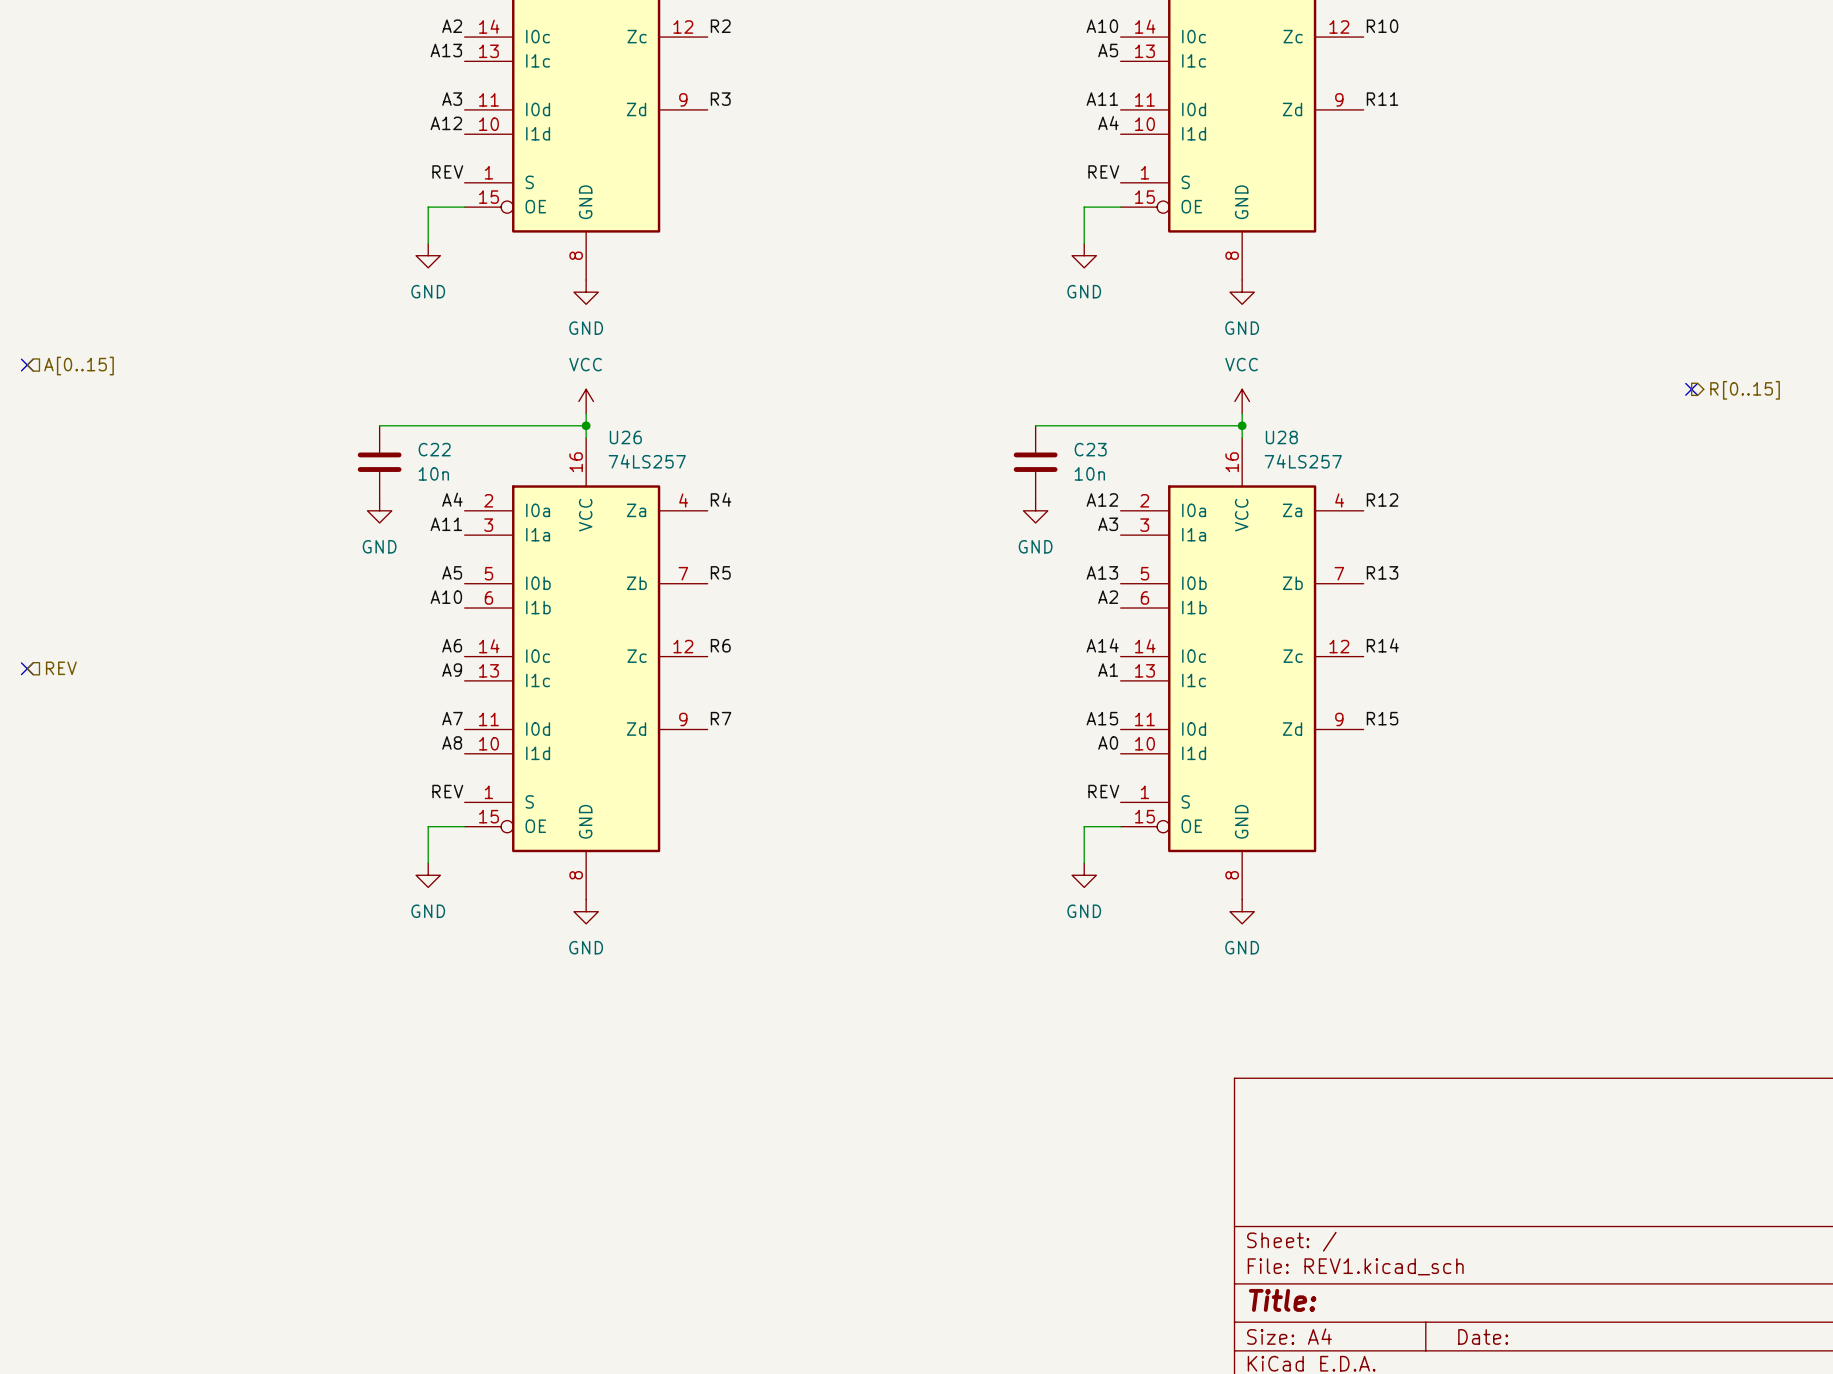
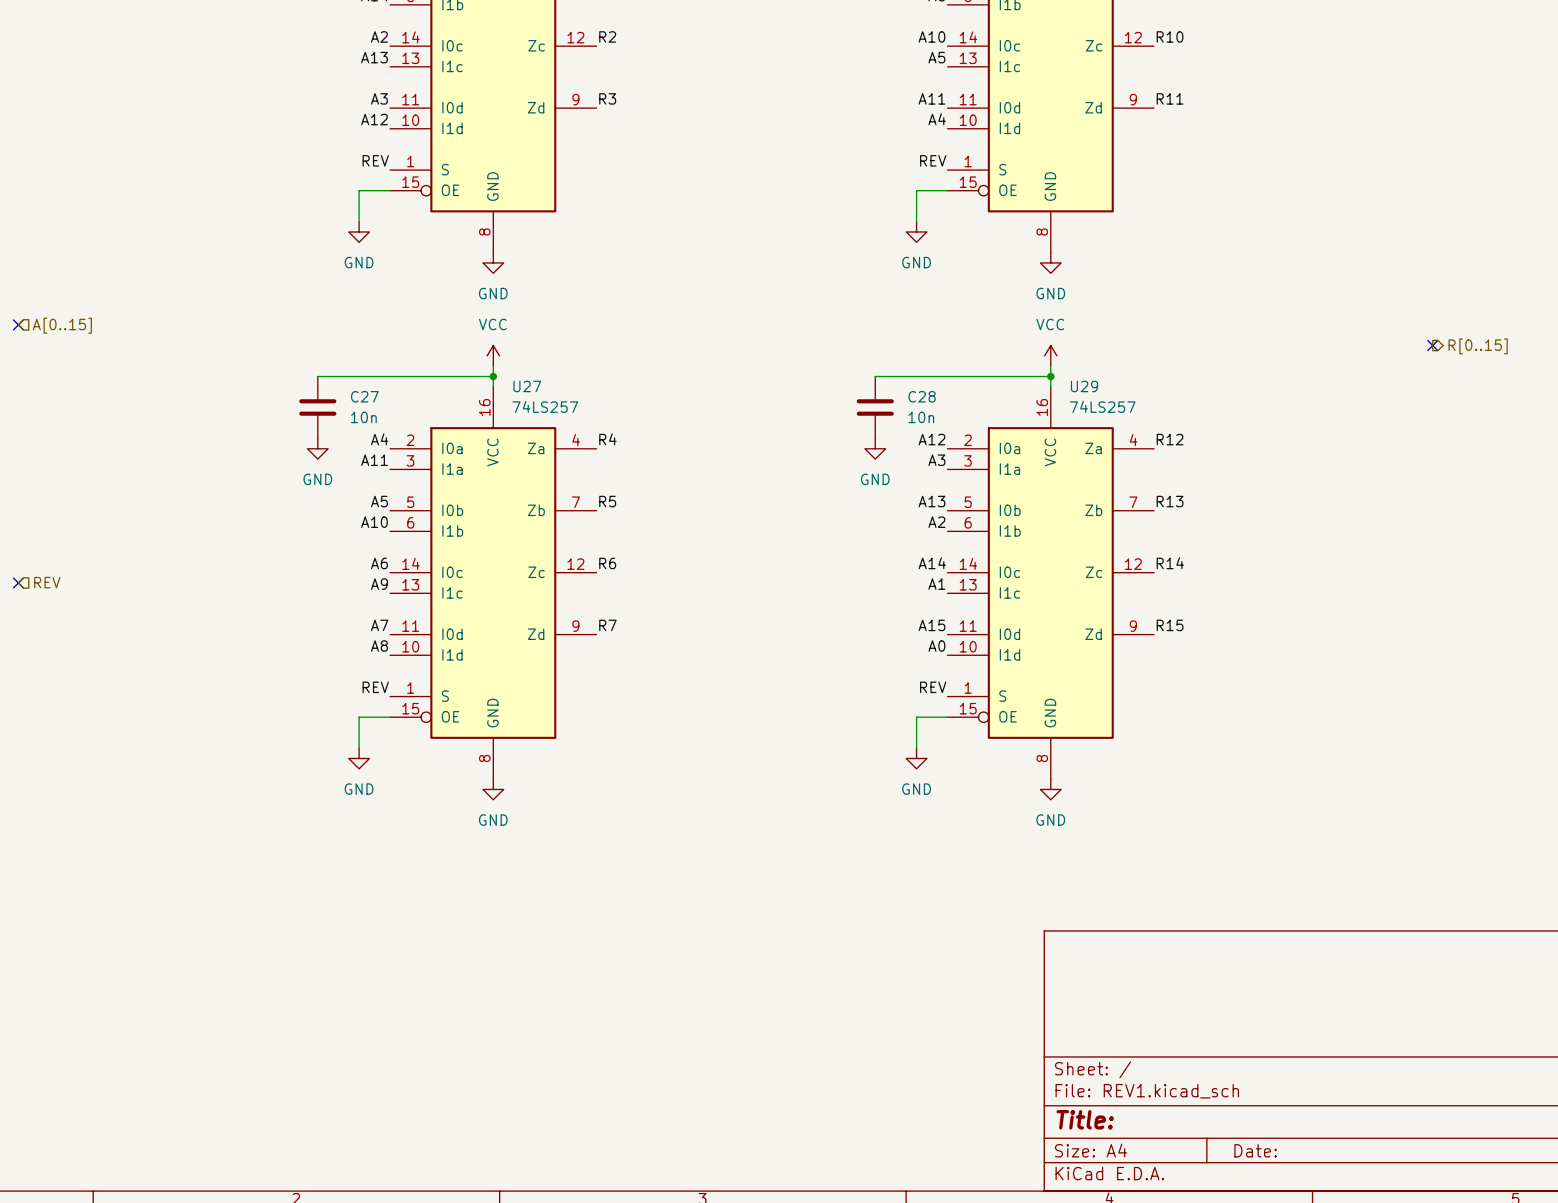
U26 name: U26 (625, 437) -> U27 (527, 386)
U28 name: U28 (1281, 437) -> U29 (1084, 386)
C22 name: C22 (434, 449) -> C27 (364, 396)
C23 name: C23 (1090, 449) -> C28 (922, 396)

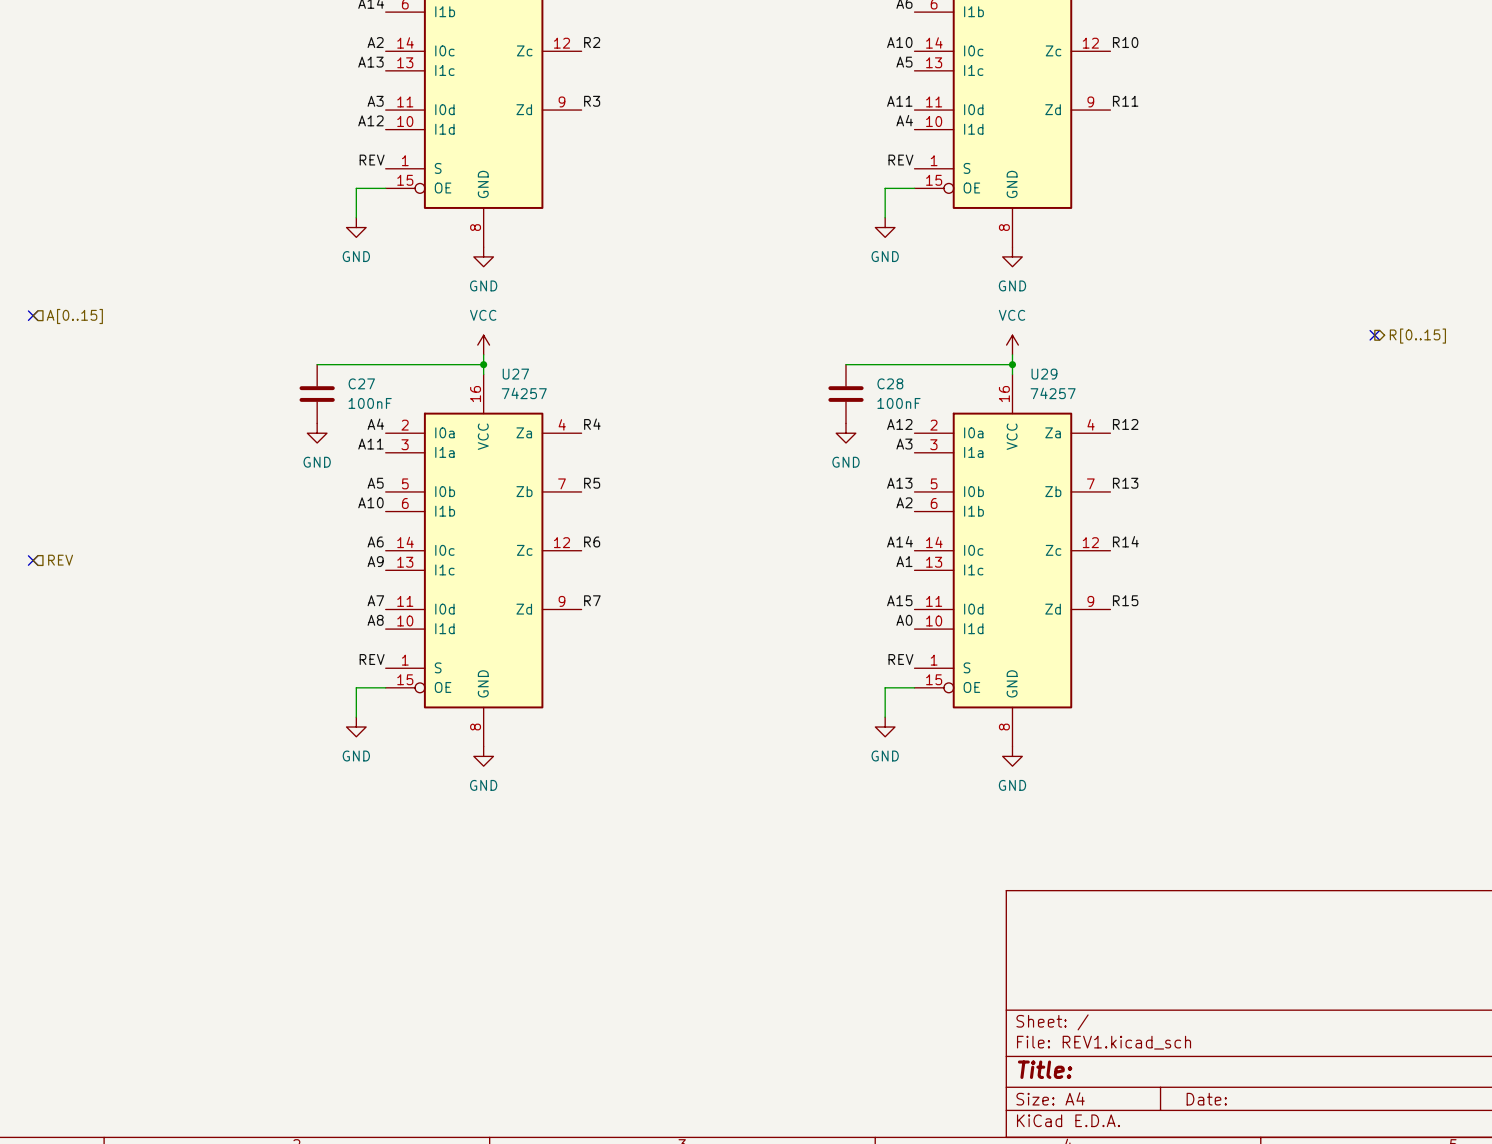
U27 value: 74LS257 (545, 406) -> 74257 (524, 393)
U29 value: 74LS257 (1102, 406) -> 74257 (1053, 393)
C27 value: 10n (363, 417) -> 100nF (370, 403)
C28 value: 10n (921, 417) -> 100nF (899, 403)

